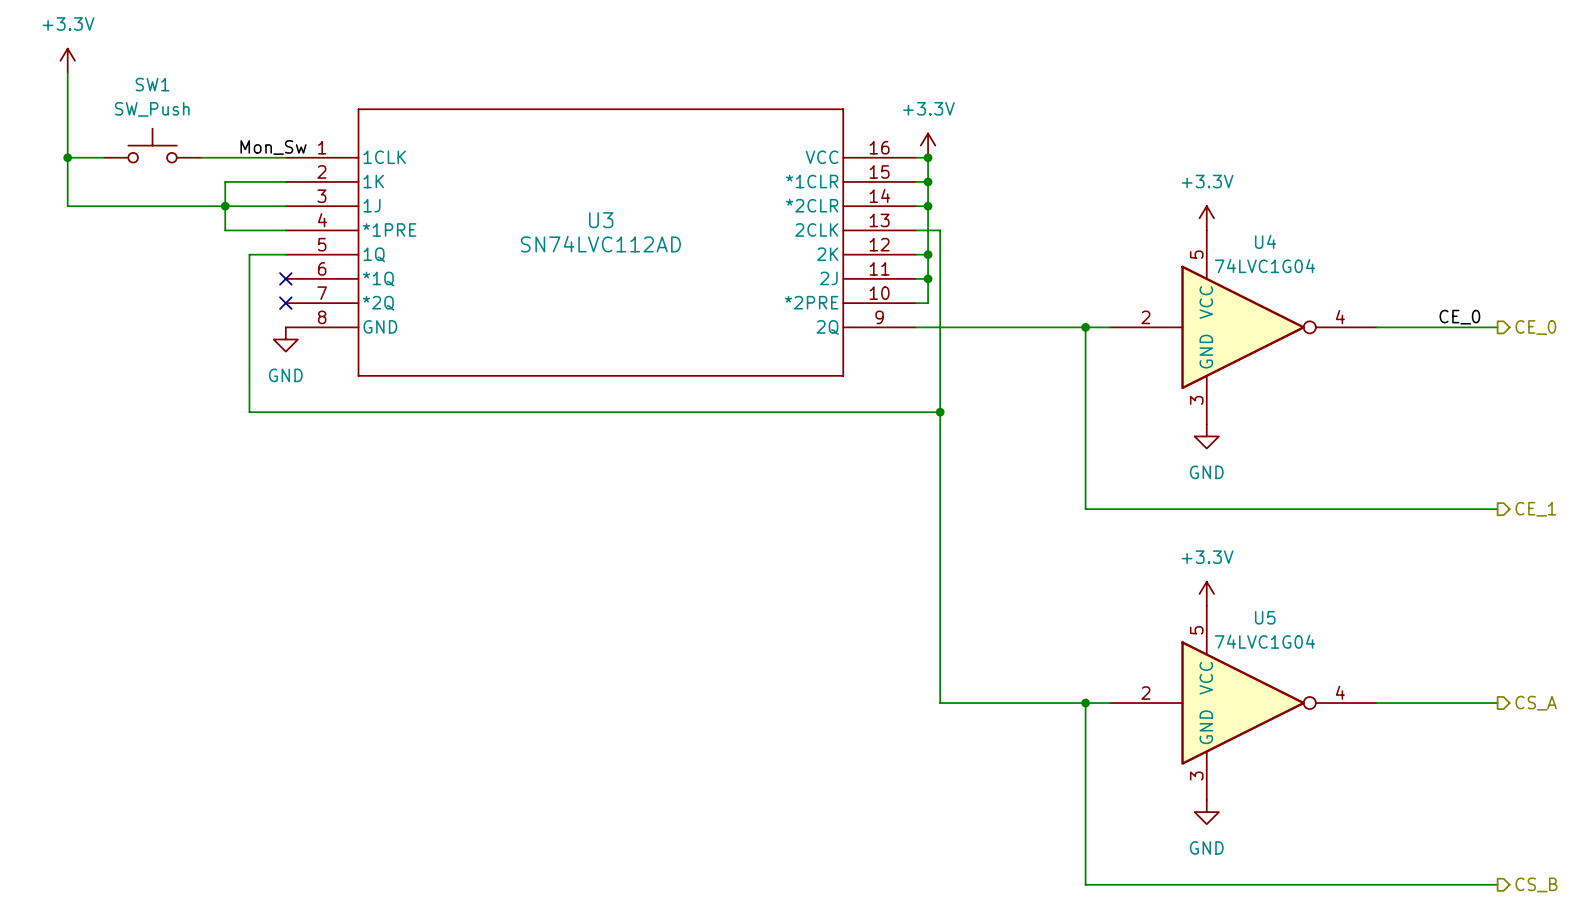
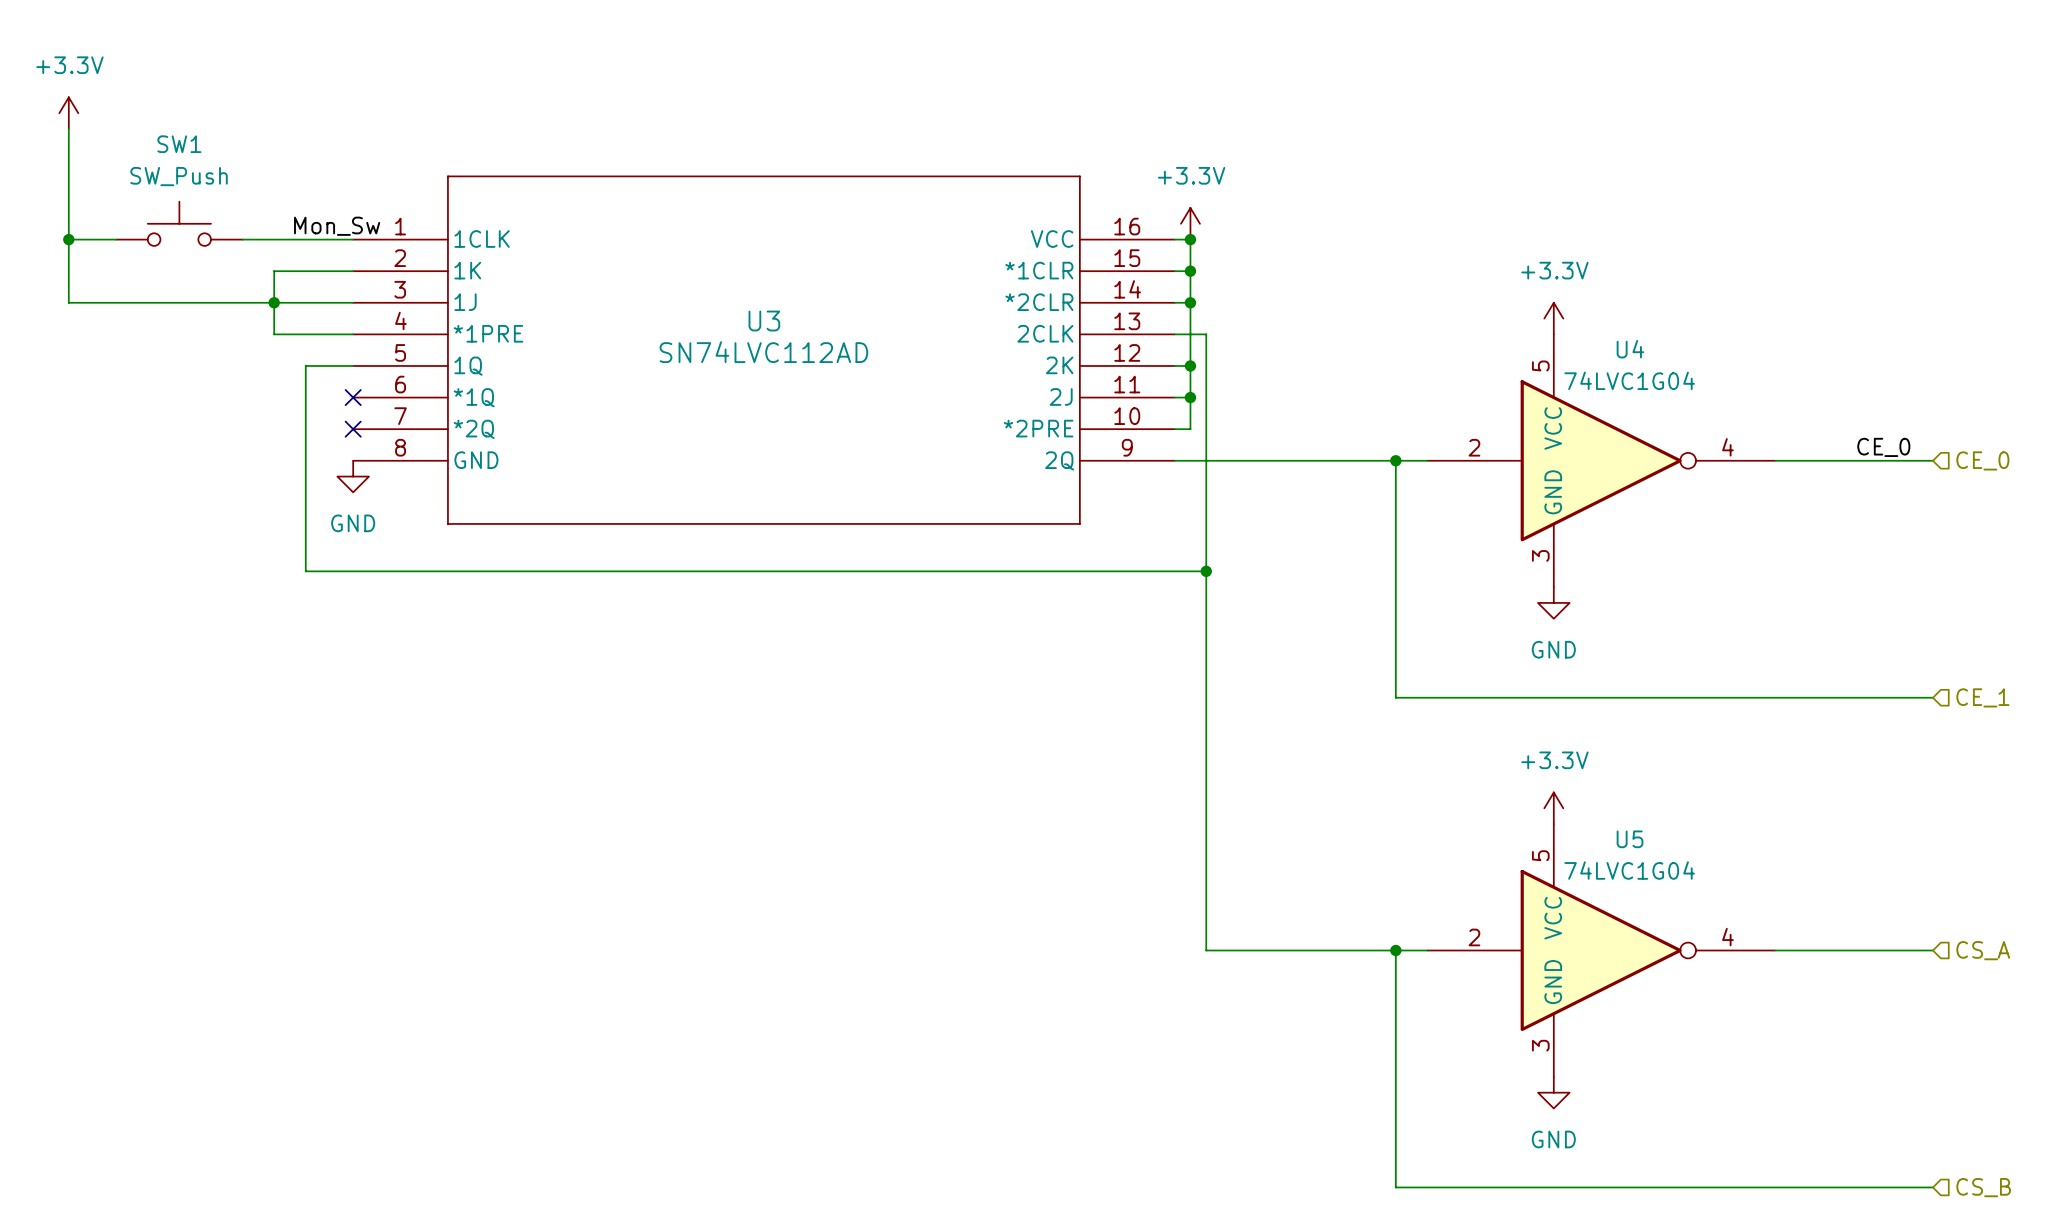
hierarchical label shape: output (1535, 327) -> input (1982, 460)
hierarchical label shape: output (1535, 509) -> input (1982, 697)
hierarchical label shape: output (1536, 703) -> input (1983, 950)
hierarchical label shape: output (1536, 884) -> input (1983, 1187)

